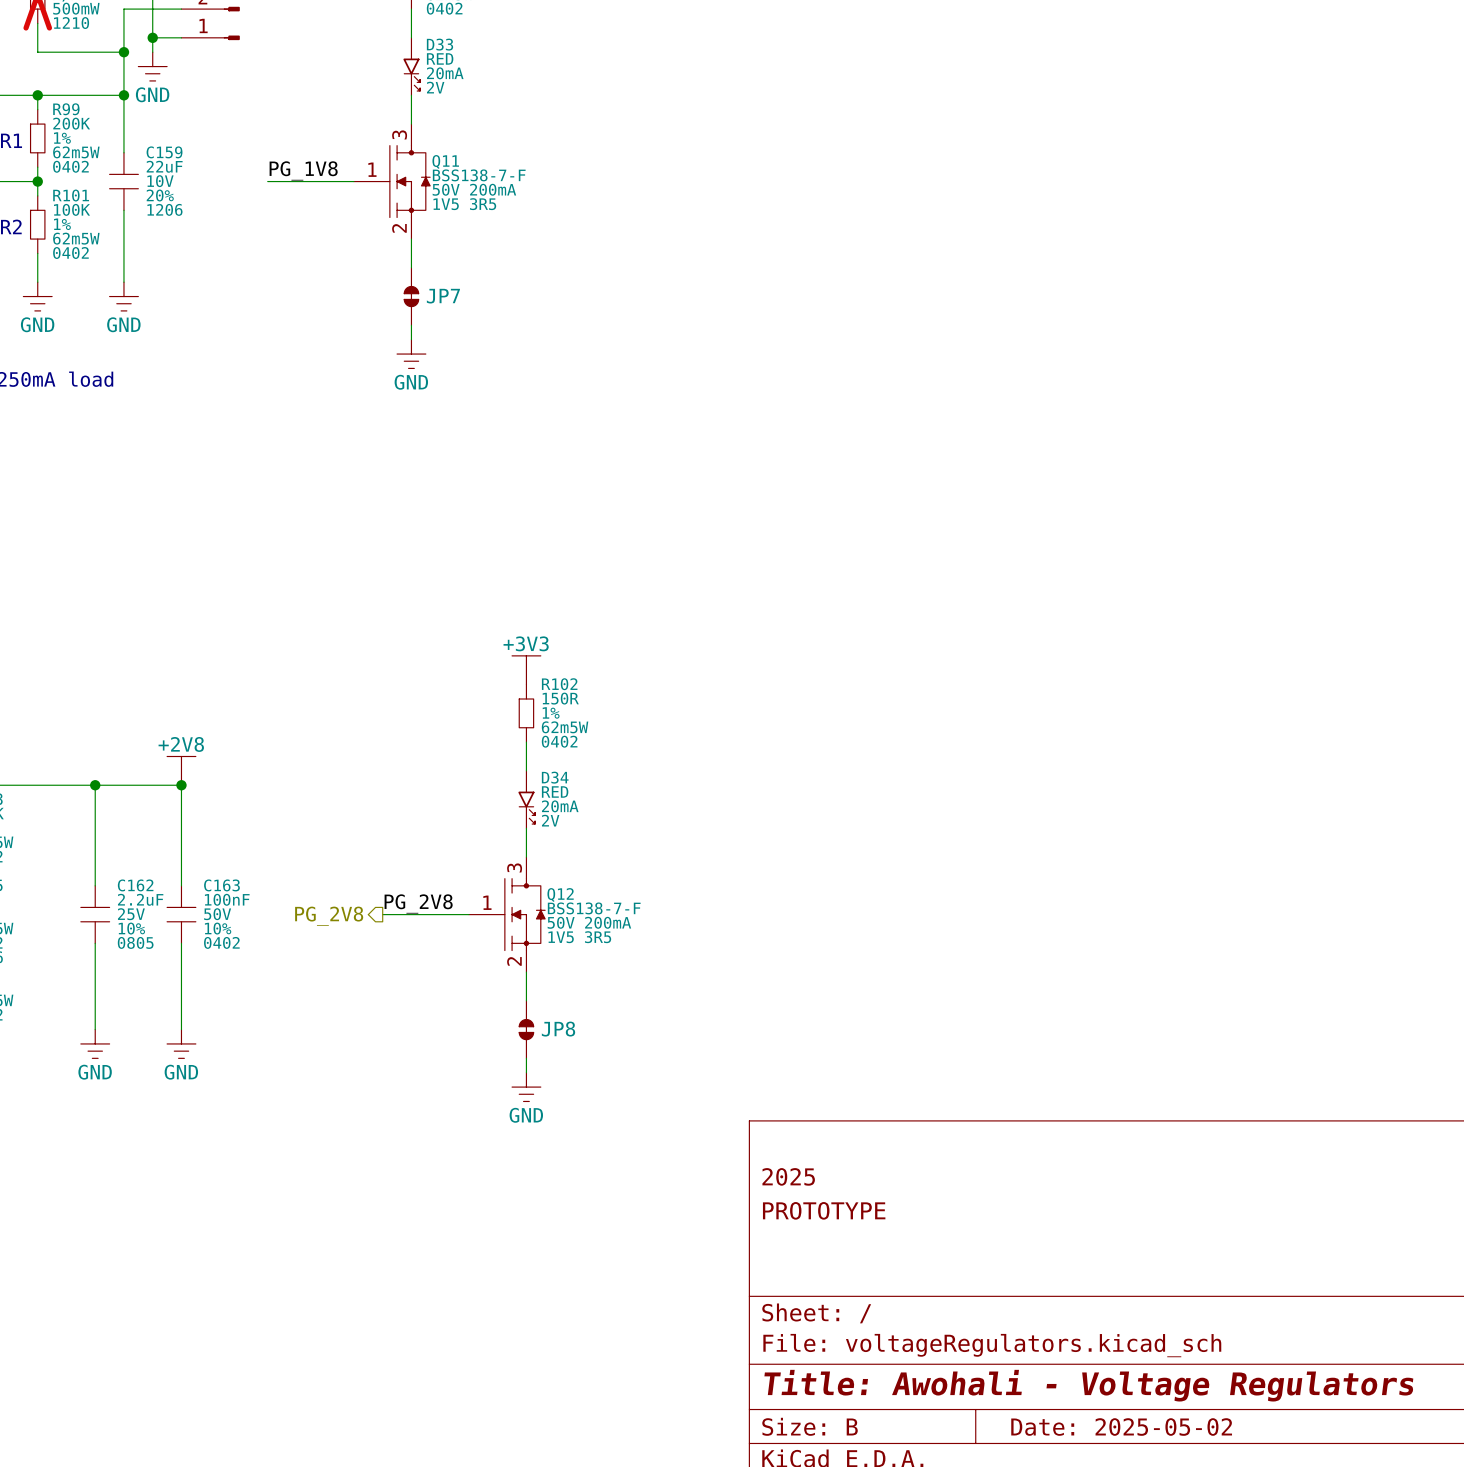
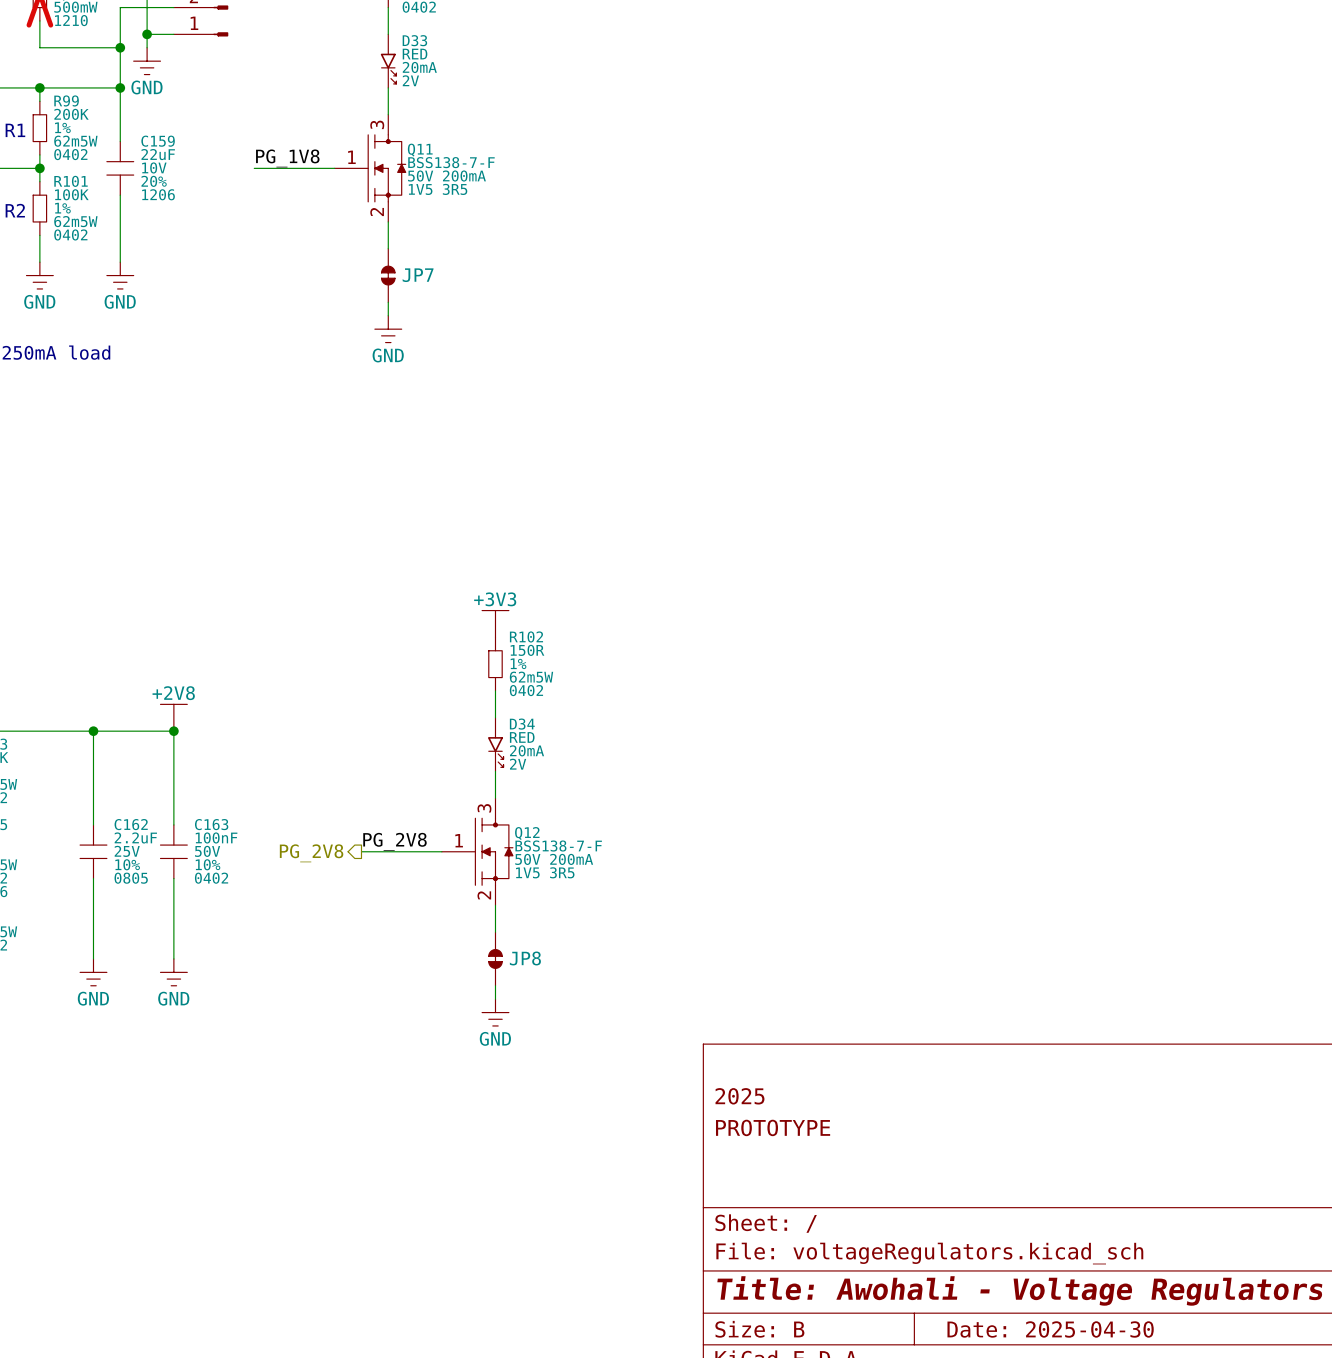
title block: Date: 2025-05-02 (1121, 1427) -> Date: 2025-04-30 (1050, 1329)

